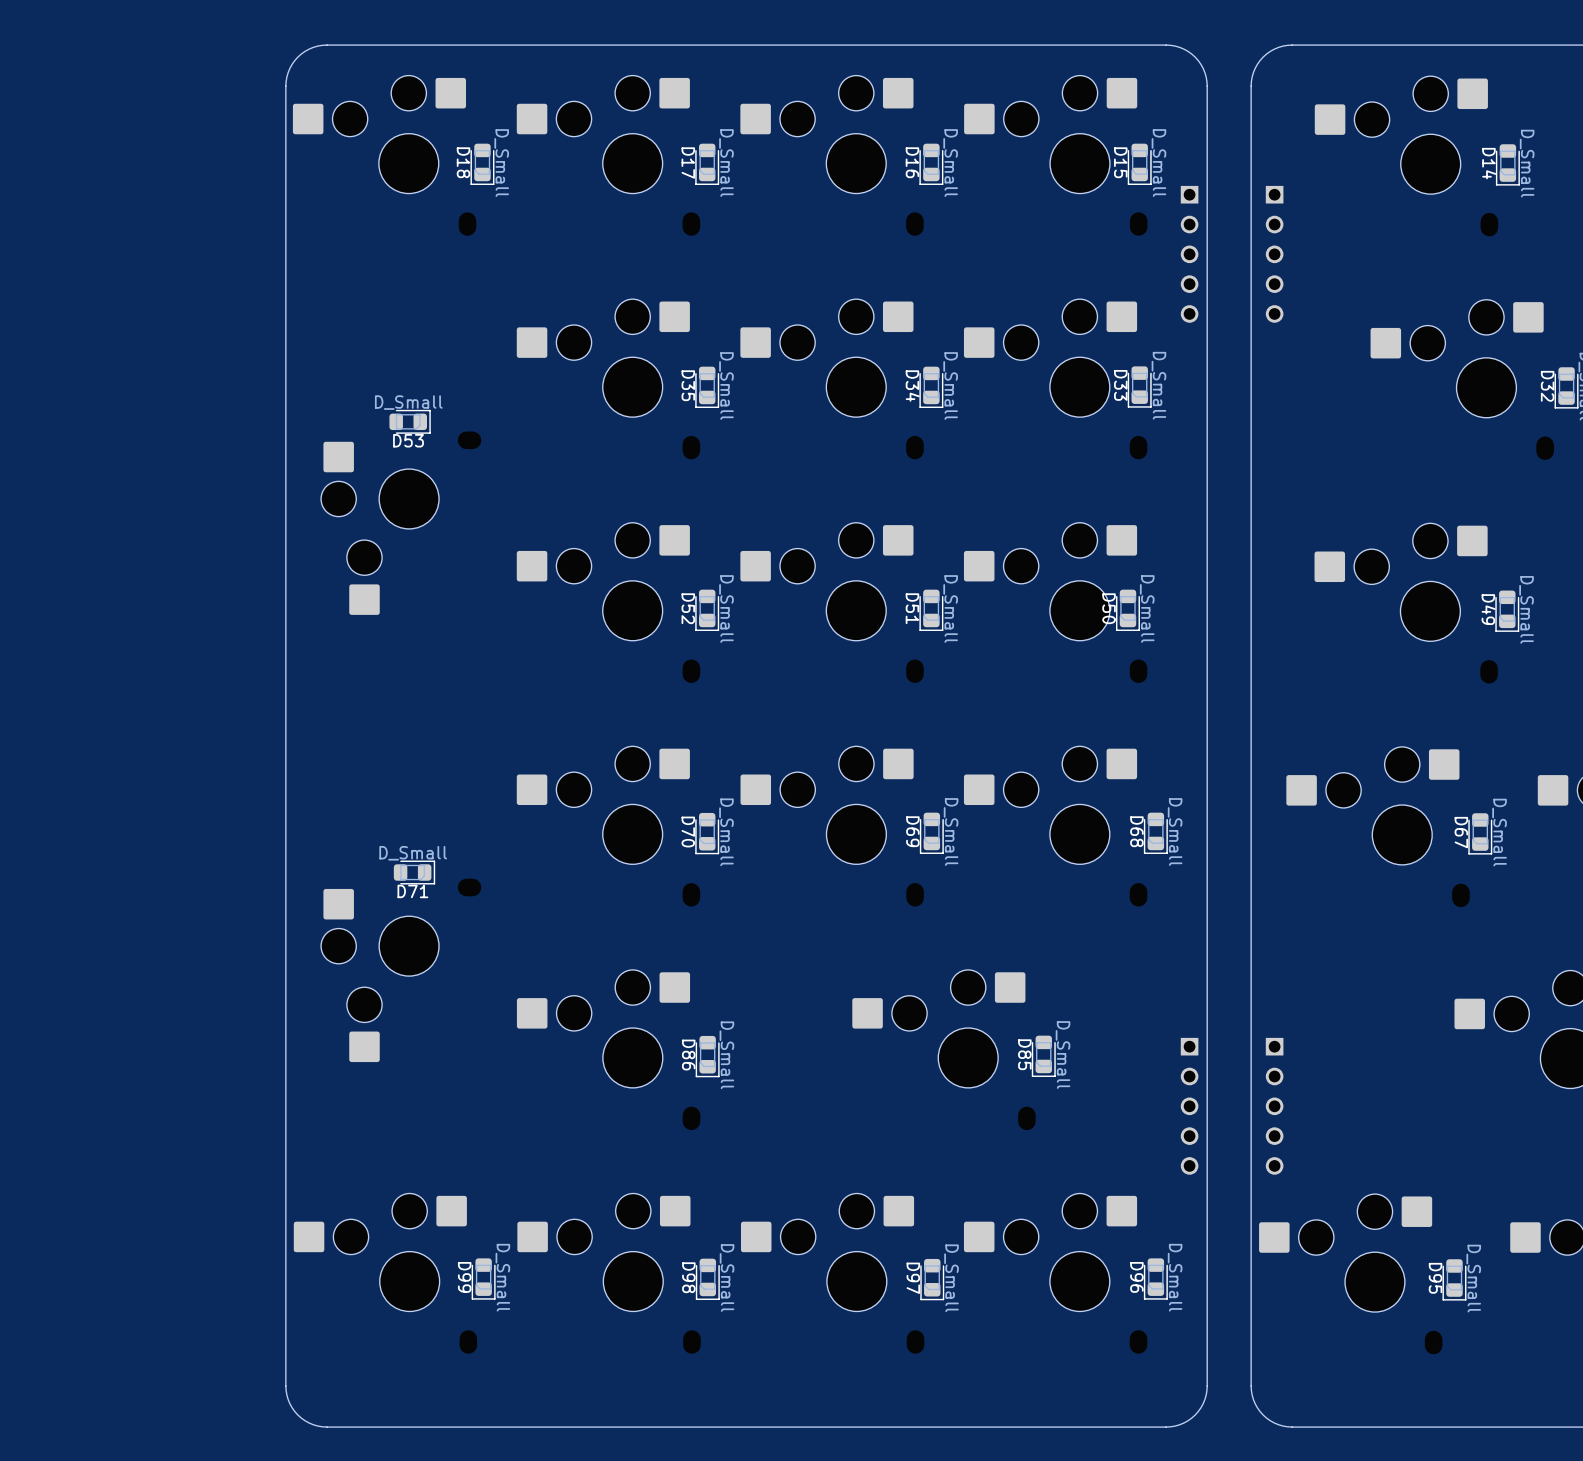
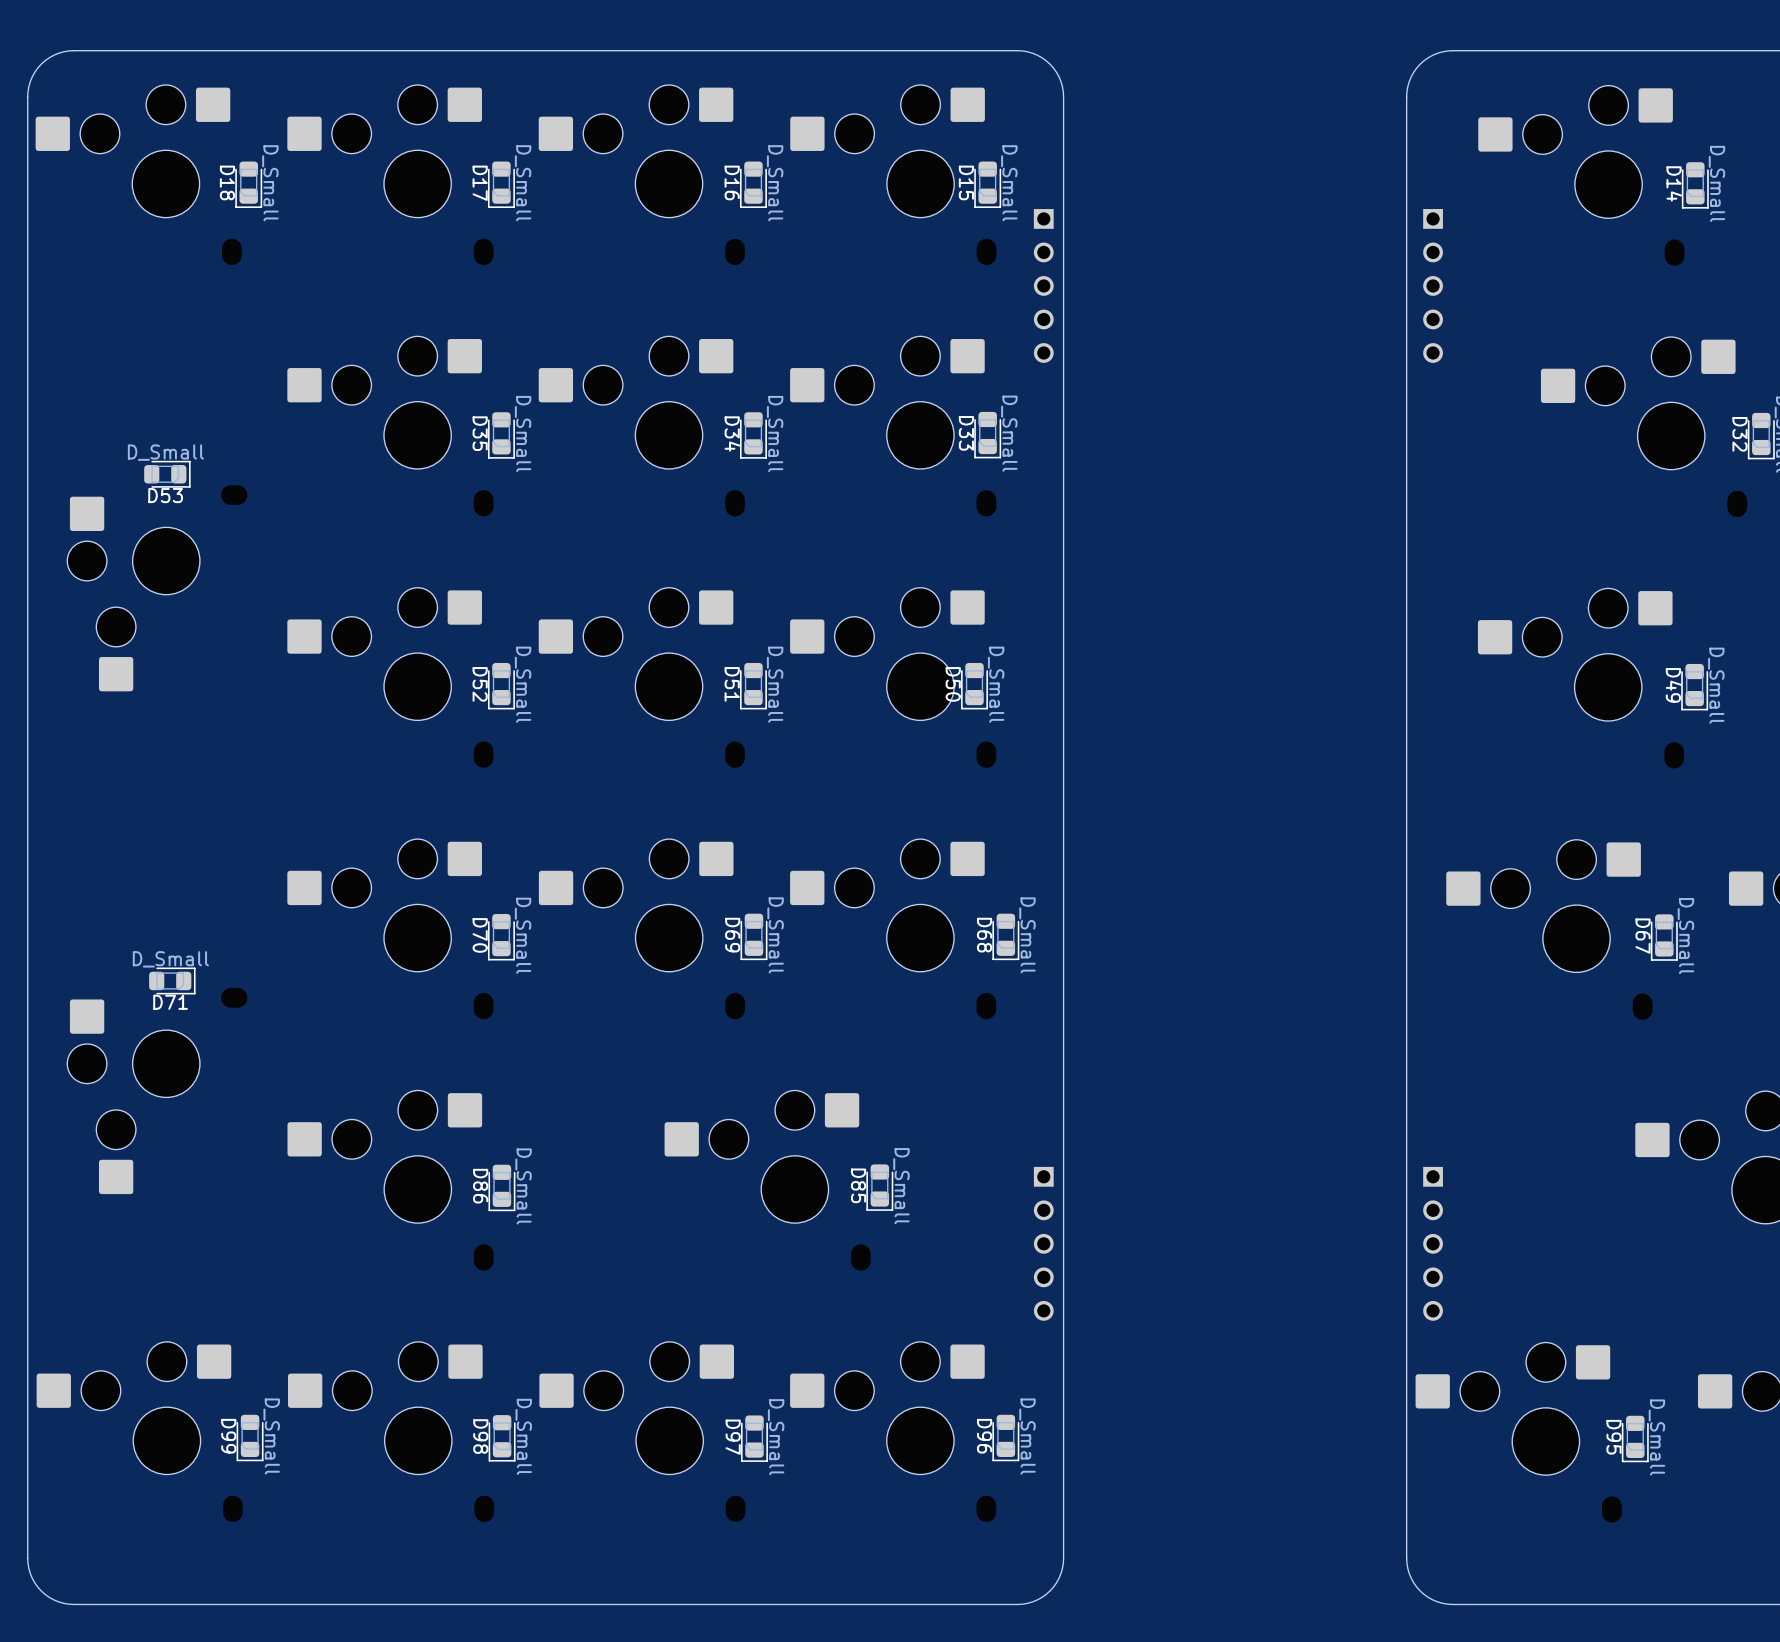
board edge: (326, 45) (309, 49) (297, 57) (288, 72) (285, 86) (285, 1385) (289, 1403) (297, 1415) (309, 1423) (326, 1427) -> (367, 50) (68, 50) (53, 55) (37, 68) (30, 81) (27, 96) (28, 1568) (34, 1582) (45, 1594) (58, 1601) (68, 1604) (367, 1604)
board edge: (904, 45) (1170, 45) (1183, 49) (1195, 57) (1203, 68) (1207, 86) (1206, 1395) (1200, 1407) (1191, 1418) (1179, 1424) (1170, 1426) (904, 1427) -> (1017, 50) (1037, 55) (1050, 64) (1060, 81) (1063, 96) (1063, 1558) (1059, 1578) (1050, 1590) (1037, 1599) (1017, 1604)
part: none -> (138, 175)
part position: (384, 155) -> (390, 175)
part position: (608, 155) -> (641, 175)
part position: (832, 155) -> (893, 175)
part: (1055, 155) -> none
D18 position: (482, 164) -> (248, 184)
D17 position: (707, 164) -> (501, 184)
D16 position: (931, 164) -> (753, 184)
D15 position: (1139, 164) -> (987, 184)
part position: (1189, 254) -> (1043, 285)
part: none -> (390, 426)
part position: (608, 379) -> (641, 426)
part position: (832, 379) -> (893, 426)
part: (1055, 379) -> none
D35 position: (707, 387) -> (501, 435)
D34 position: (931, 387) -> (753, 435)
D33 position: (1139, 387) -> (987, 435)
D53 position: (410, 421) -> (167, 474)
part: none -> (157, 588)
part: (401, 523) -> none
part: none -> (390, 677)
part position: (608, 602) -> (641, 677)
part position: (832, 602) -> (893, 677)
part: (1055, 602) -> none
D52 position: (707, 610) -> (501, 686)
D51 position: (931, 610) -> (753, 686)
D50 position: (1127, 610) -> (974, 686)
part: none -> (390, 929)
part position: (608, 826) -> (641, 929)
part position: (832, 826) -> (893, 929)
part: (1055, 826) -> none
D70 position: (707, 833) -> (501, 937)
D69 position: (931, 833) -> (753, 936)
D68 position: (1155, 833) -> (1005, 936)
D71 position: (414, 872) -> (172, 980)
part: none -> (157, 1090)
part: (401, 970) -> none
part: none -> (390, 1180)
part position: (608, 1050) -> (767, 1180)
part: (944, 1050) -> none
D86 position: (707, 1056) -> (501, 1187)
D85 position: (1043, 1056) -> (879, 1187)
part position: (1189, 1106) -> (1043, 1243)
part: none -> (139, 1431)
part position: (385, 1273) -> (391, 1431)
part position: (609, 1273) -> (642, 1431)
part position: (832, 1273) -> (893, 1431)
part: (1055, 1273) -> none
D99 position: (483, 1279) -> (250, 1438)
D98 position: (707, 1279) -> (502, 1438)
D97 position: (932, 1279) -> (754, 1438)
D96 position: (1155, 1279) -> (1005, 1438)

